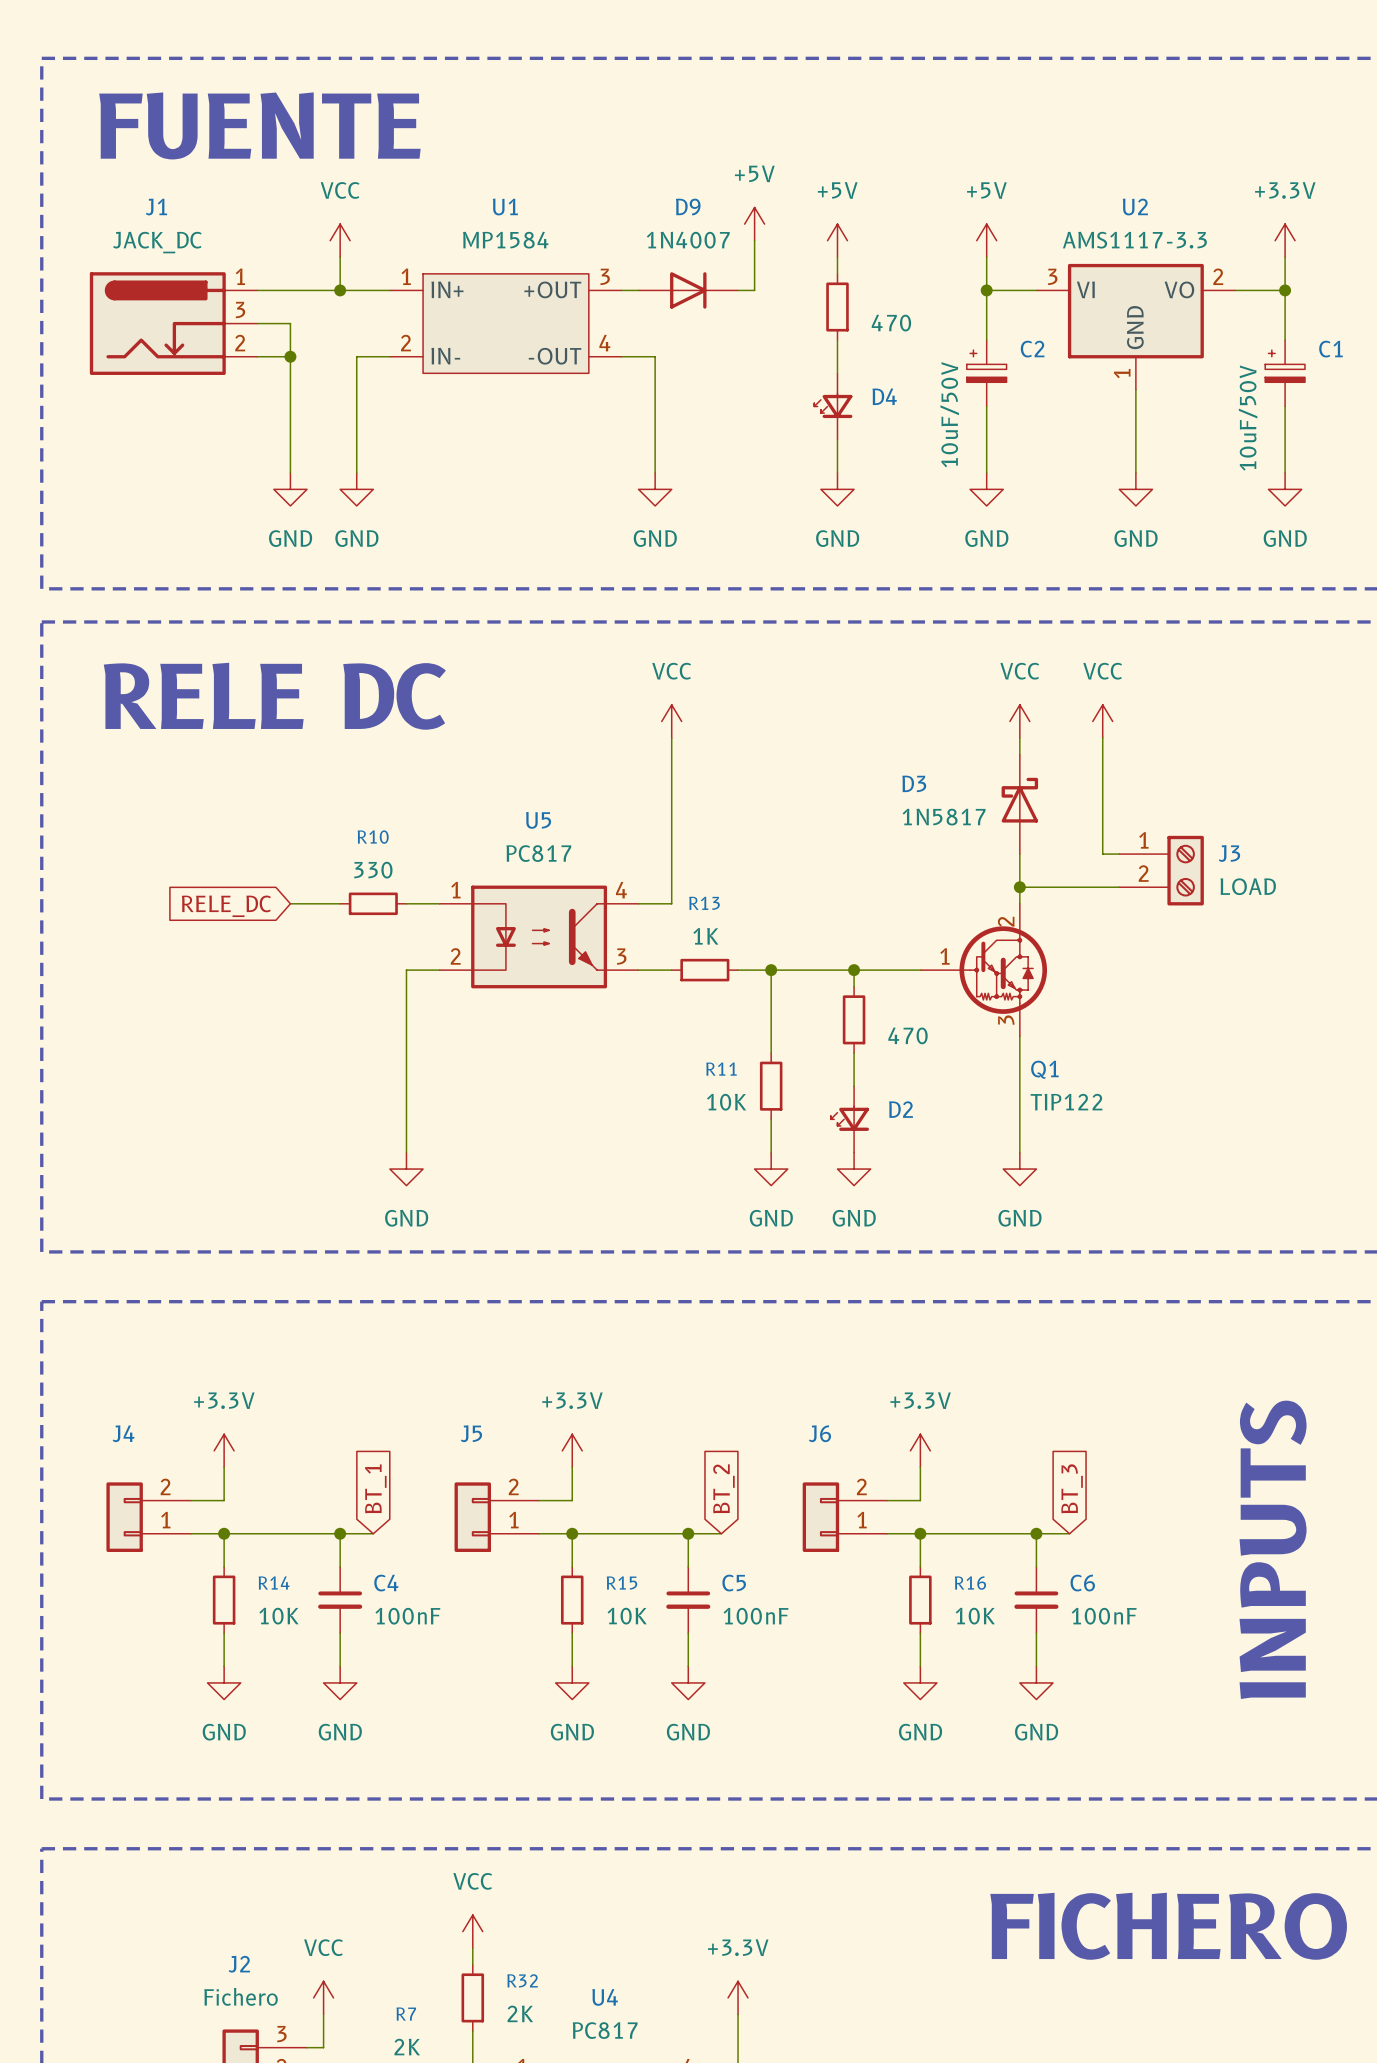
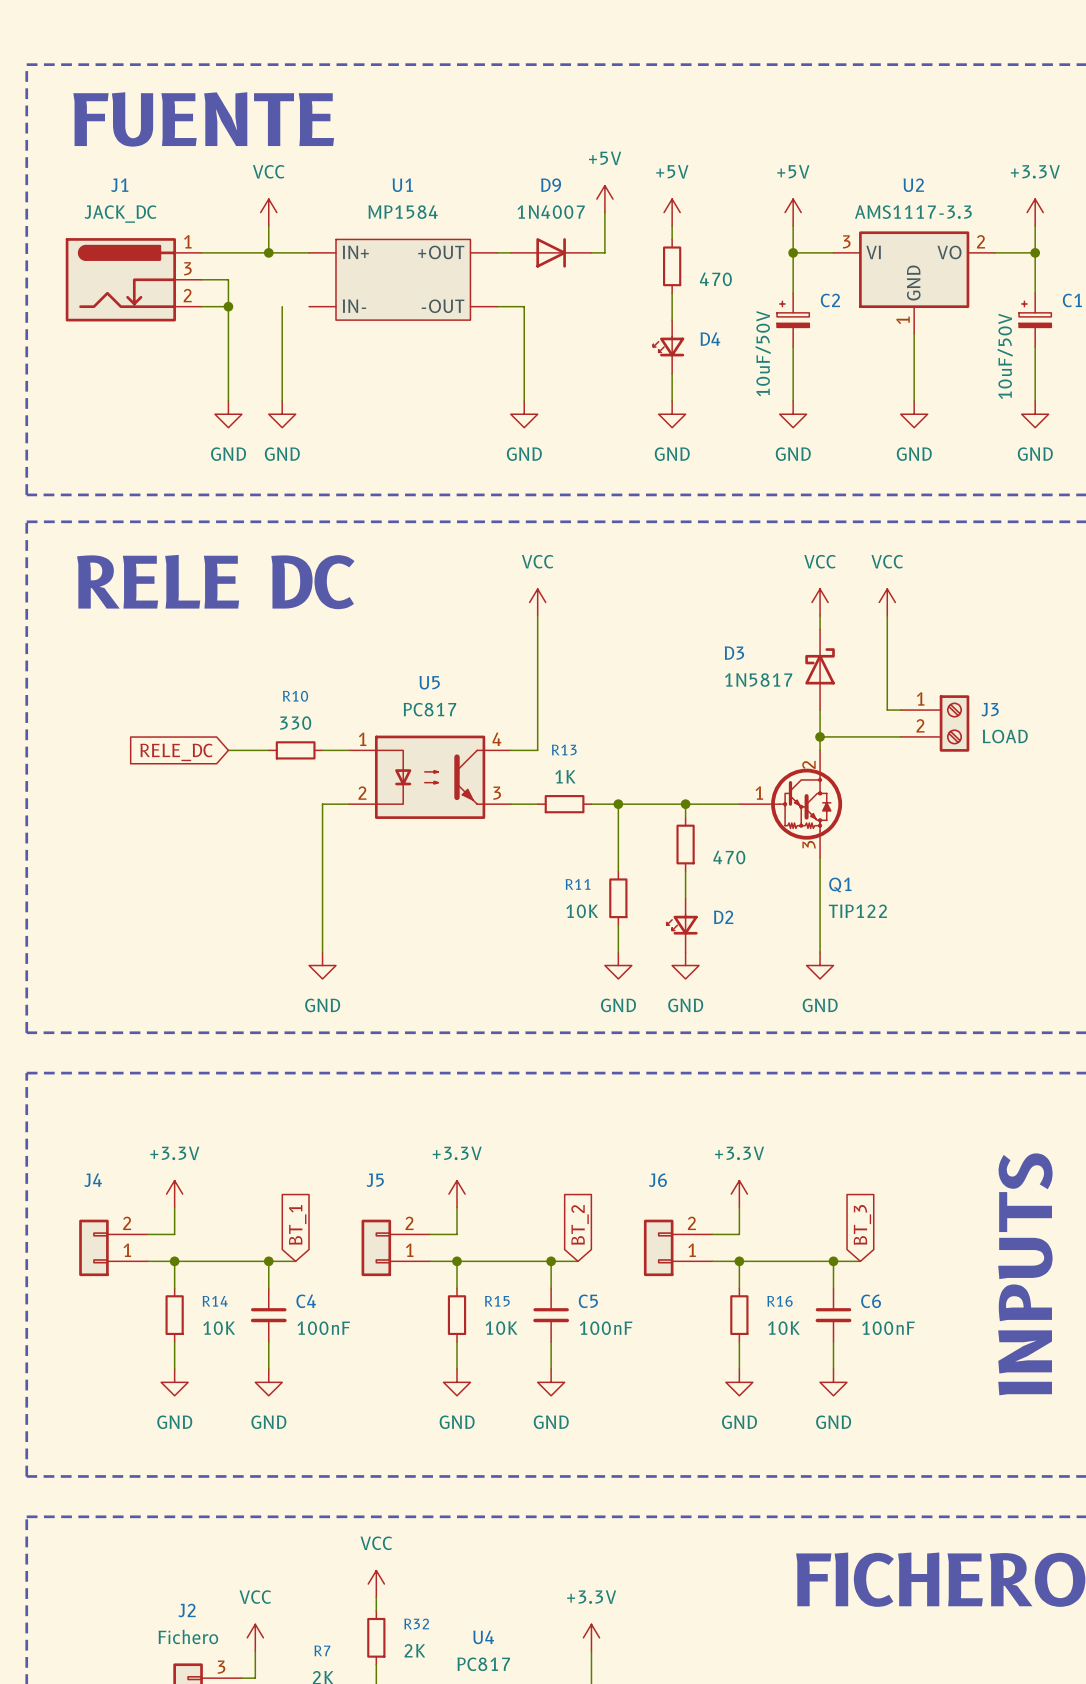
U1 pin number: 1 (406, 276) -> none
U1 pin number: 3 (605, 276) -> none
U1 pin number: 2 (405, 343) -> none
U1 pin number: 4 (604, 343) -> none
wire: (356, 356) (389, 356) -> none

